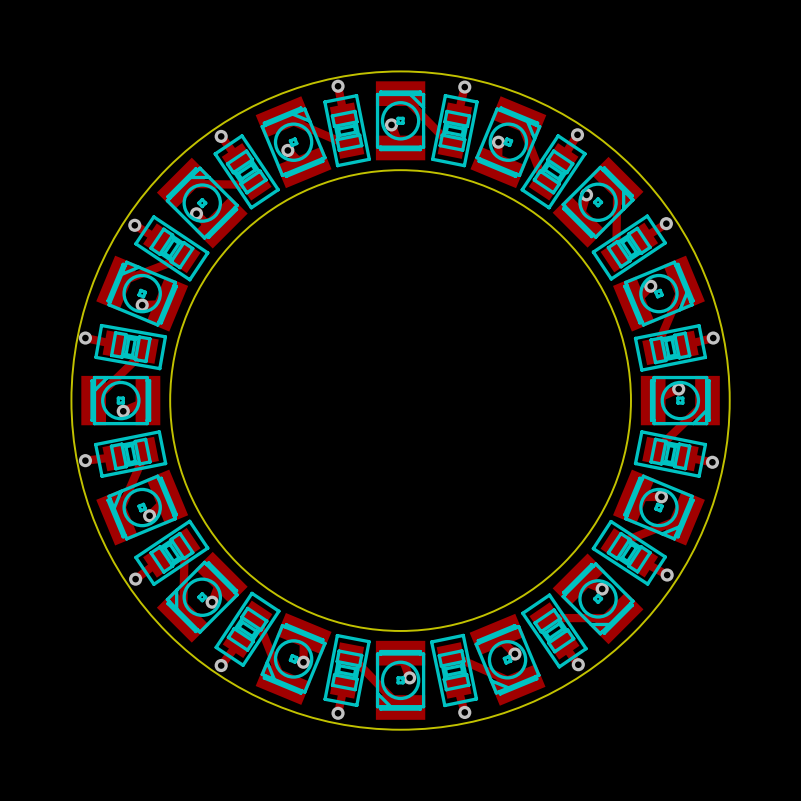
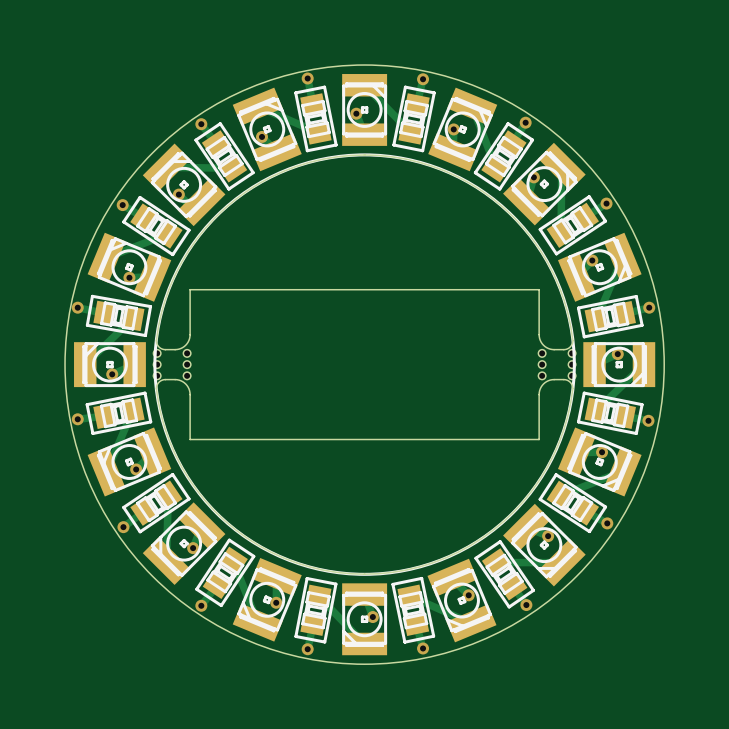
drawing: none -> [153, 153, 576, 576]
round board edge: [169, 169, 632, 632] -> none
board edge: none -> (364, 155) (378, 155) (392, 156) (432, 166) (470, 183) (504, 208) (532, 238) (553, 274) (567, 313) (572, 340) (570, 347) (565, 349) (552, 349) (546, 347) (541, 342) (539, 334) (539, 289) (190, 289) (190, 334) (188, 342) (182, 347) (177, 349) (164, 349) (159, 347) (156, 340) (161, 313) (175, 274) (197, 238) (225, 208) (258, 183) (283, 171) (323, 159) (350, 155) (364, 155)
part: none -> (172, 364)
part: none -> (557, 364)
board edge: none -> (364, 574) (378, 573) (405, 570) (432, 562) (470, 545) (504, 521) (532, 490) (553, 454) (567, 415) (572, 388) (570, 382) (565, 379) (552, 379) (544, 382) (541, 387) (539, 394) (539, 439) (190, 439) (190, 394) (188, 387) (184, 382) (177, 379) (164, 379) (159, 382) (156, 388) (161, 415) (175, 454) (197, 490) (225, 521) (247, 538) (283, 557) (323, 570) (350, 573) (364, 574)

